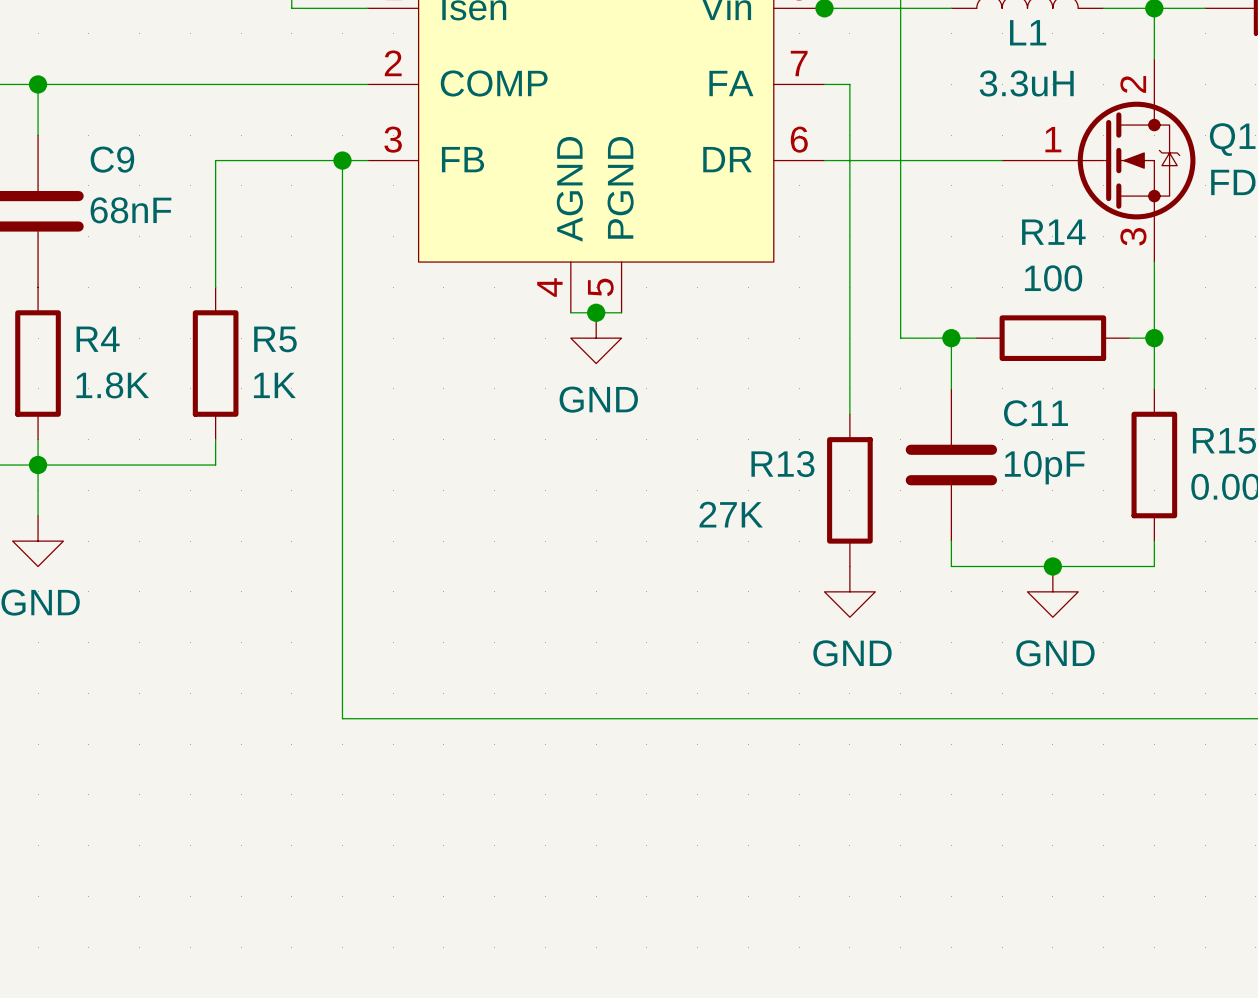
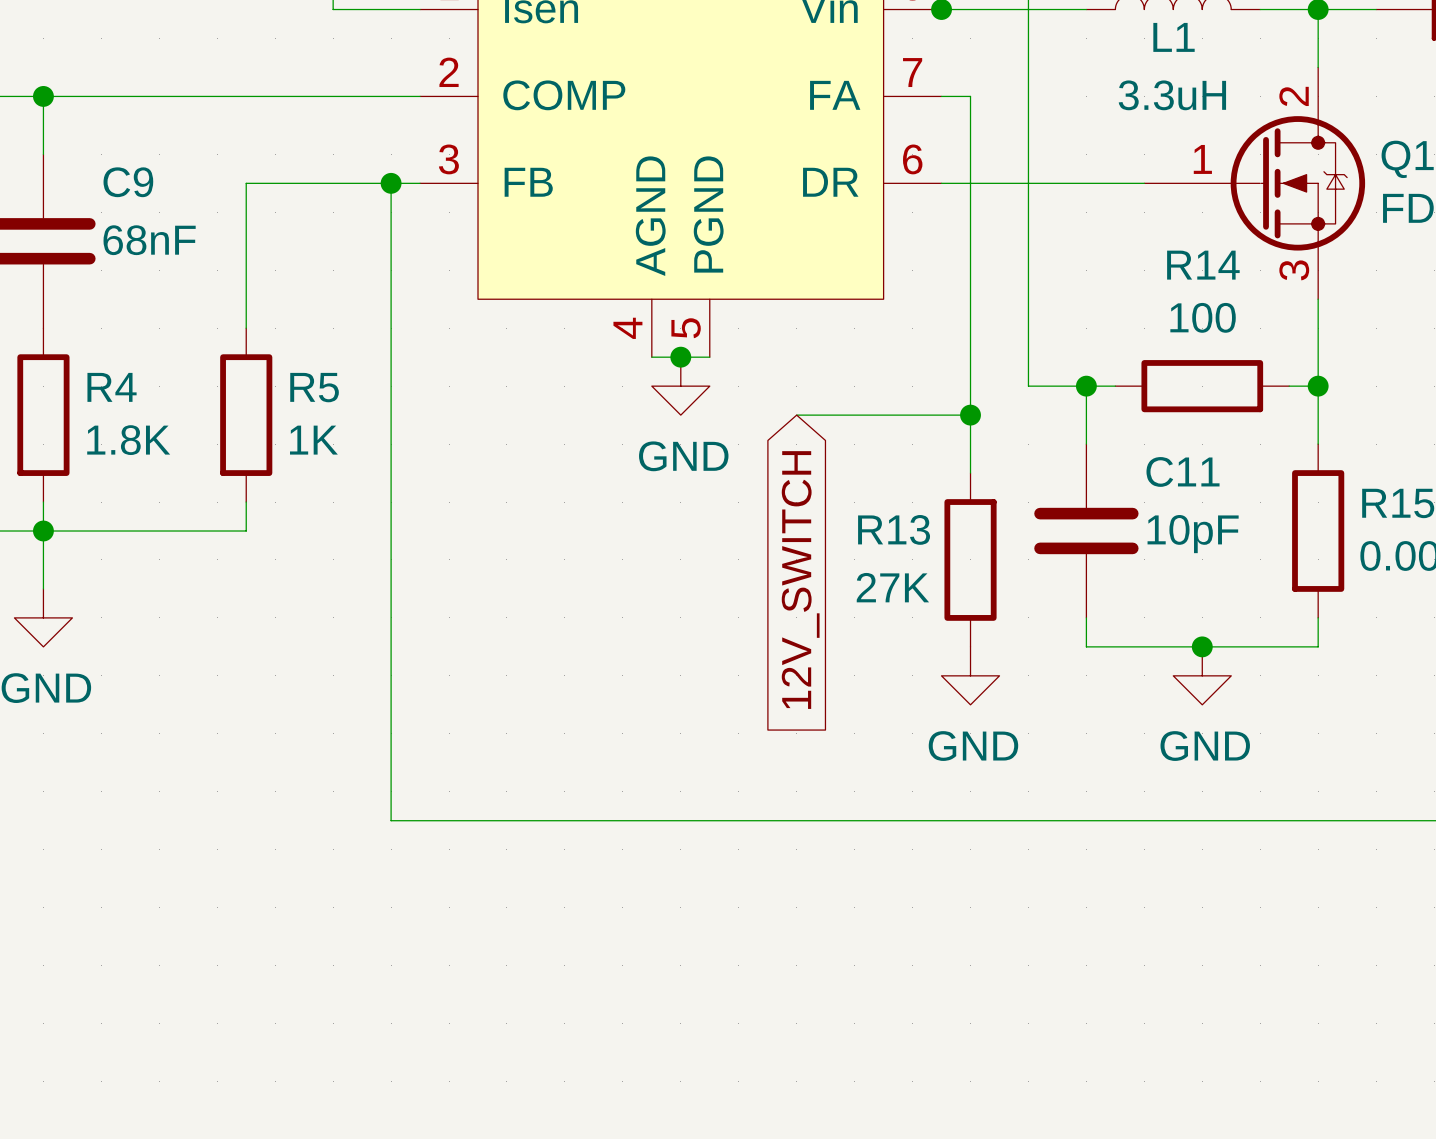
wire: none -> (796, 415) (970, 415)
junction: none -> (970, 415)
global label: none -> 12V_SWITCH (800, 580)
R13 value position: 27K (731, 514) -> 27K (892, 587)

